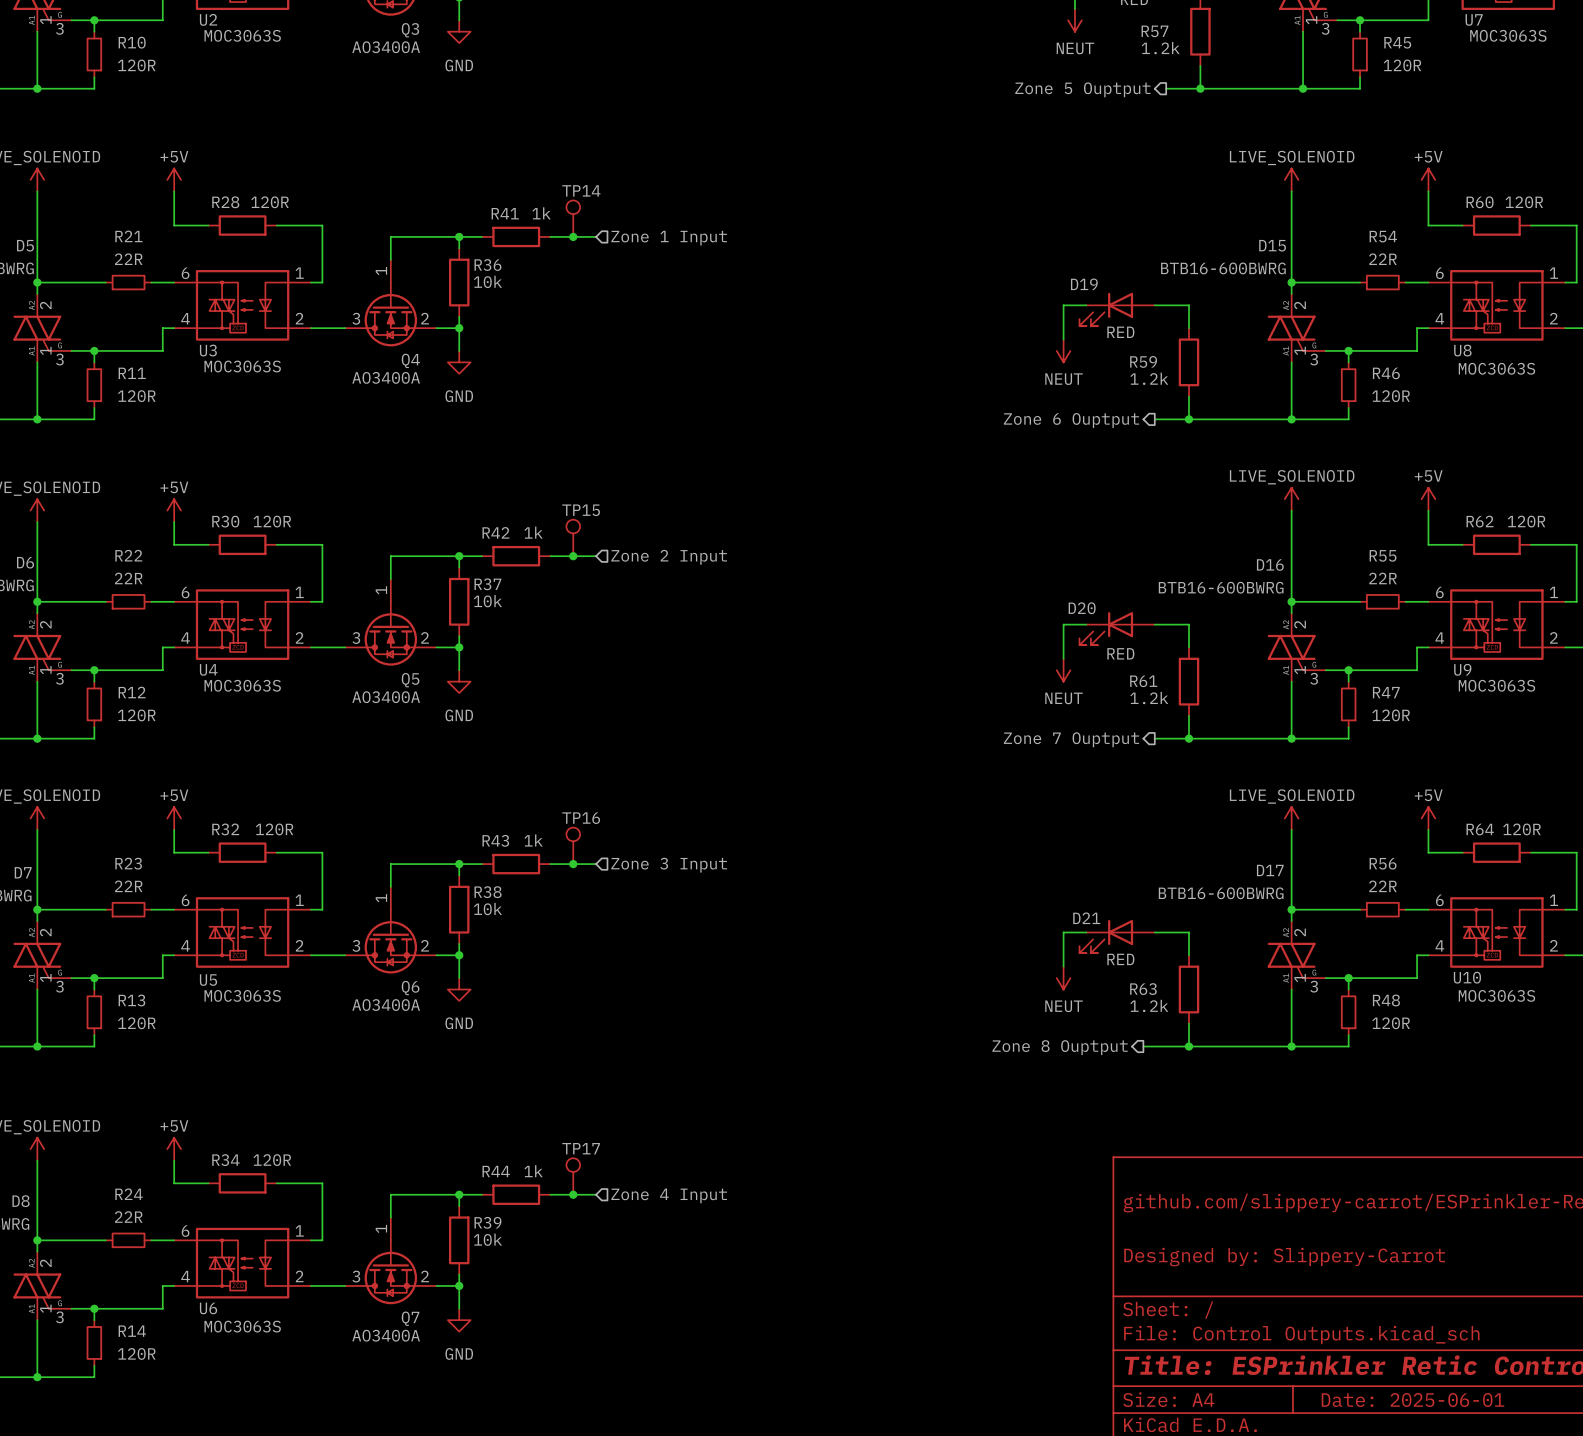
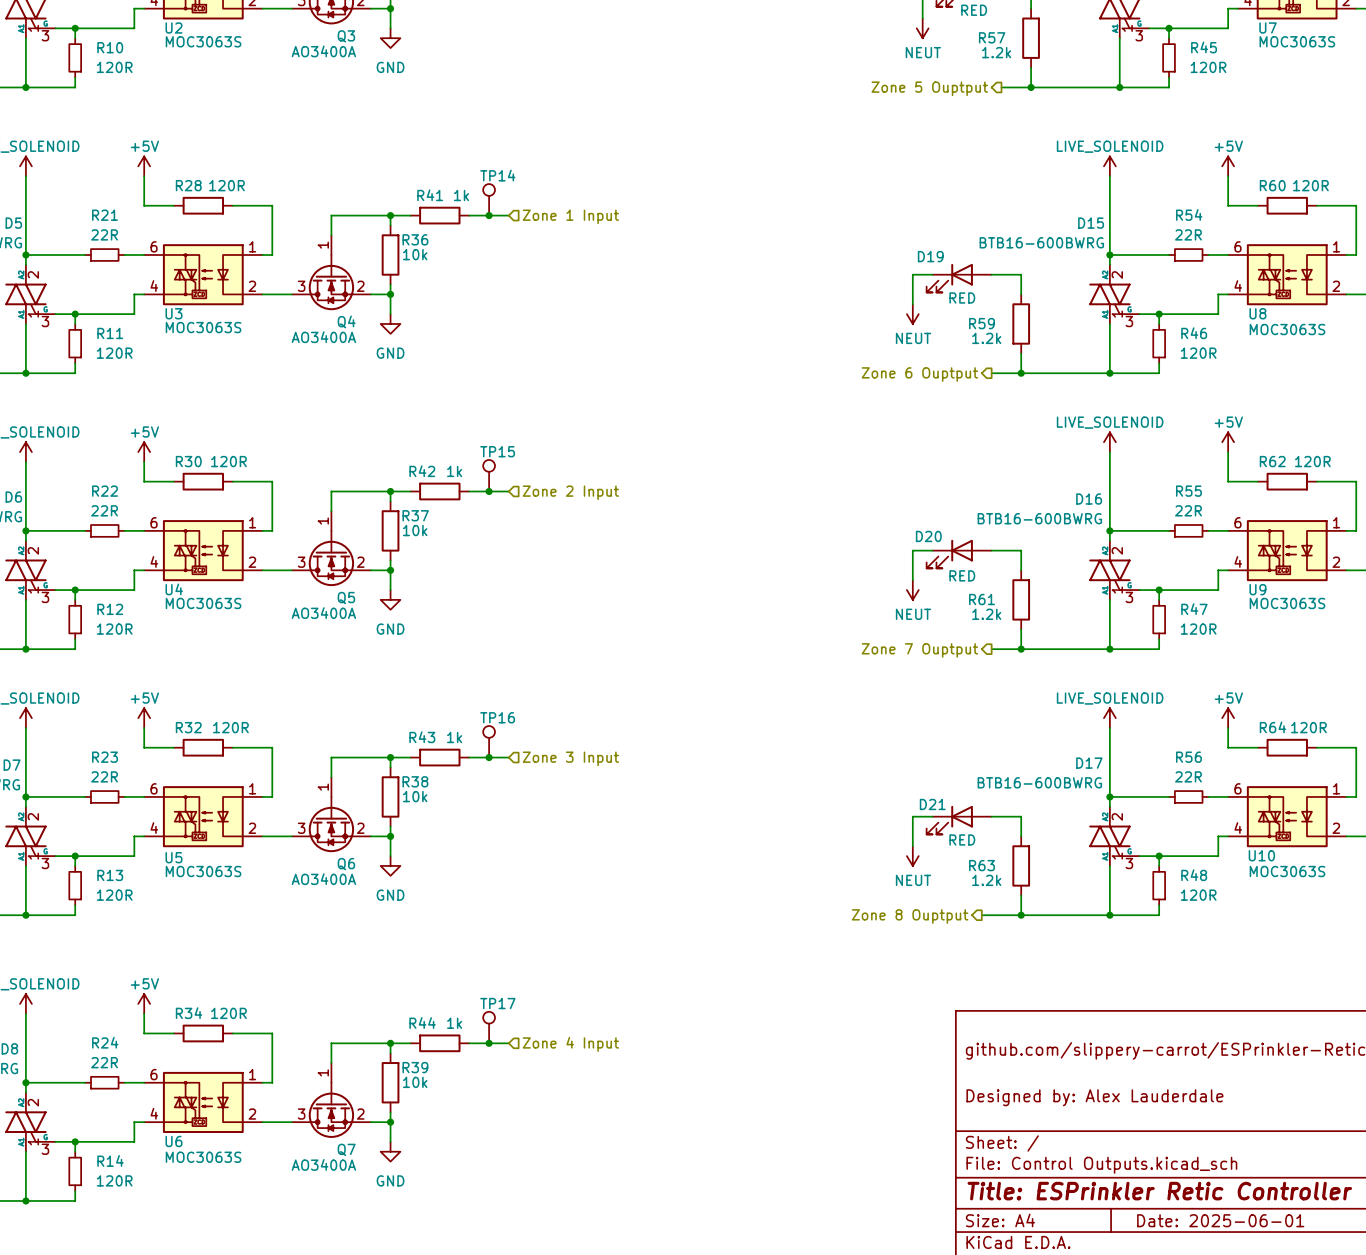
title block: Designed by: Slippery-Carrot (1284, 1257) -> Designed by: Alex Lauderdale (1094, 1097)

